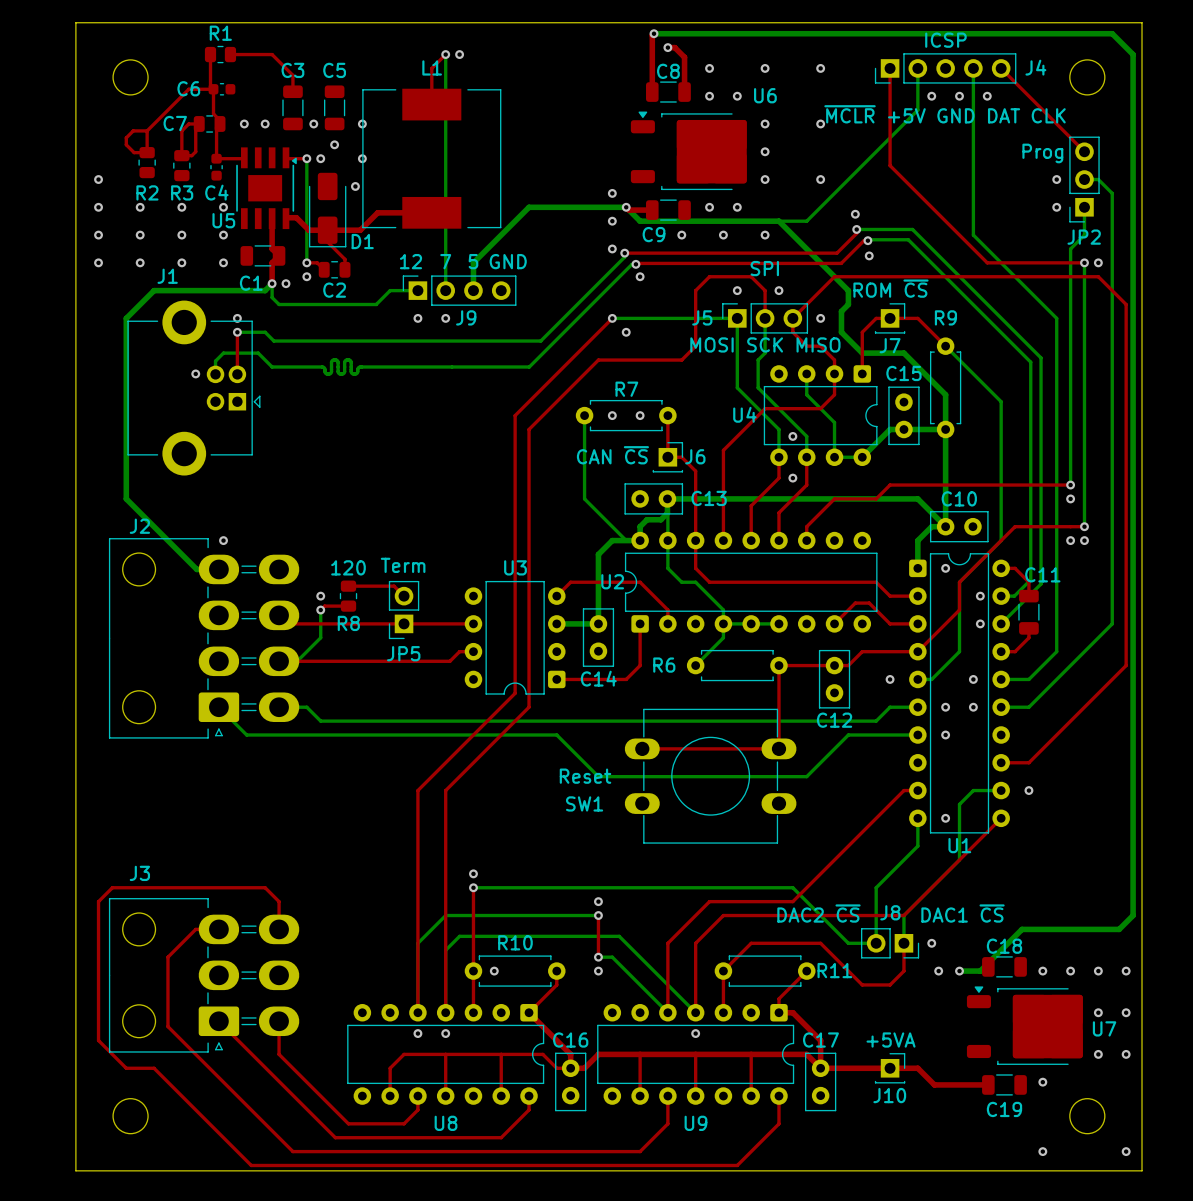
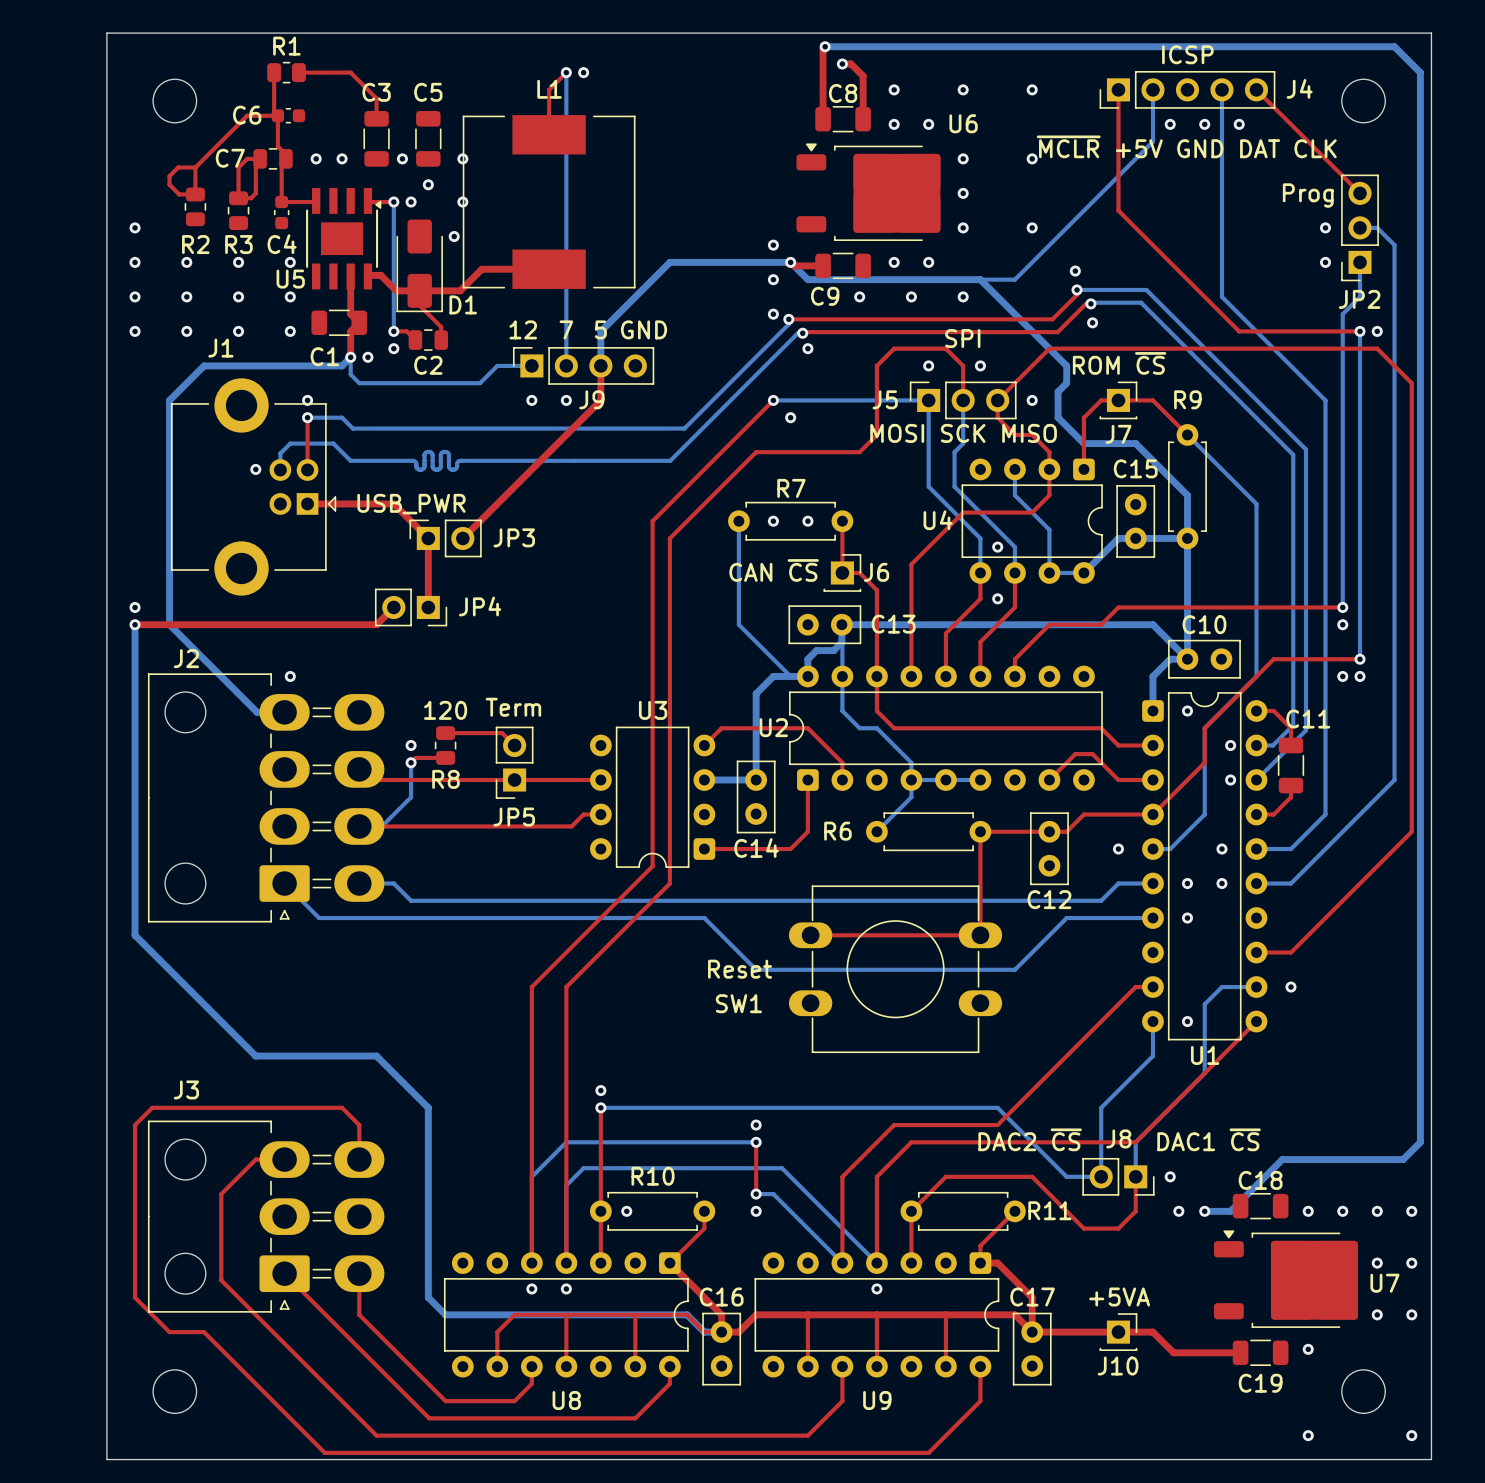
top track: none -> (600, 365) (600, 400) (462, 538)
top track: none -> (307, 503) (393, 503) (428, 538) (428, 607)
JP3: none -> USB_PWR (445, 538)
via: none -> (135, 607)
top track: none -> (393, 607) (376, 624) (135, 624)
JP4: none -> (411, 607)
bottom track: none -> (135, 624) (135, 935) (255, 1056) (376, 1056) (428, 1107) (428, 1297) (445, 1314) (687, 1314) (704, 1332) (721, 1332)
via: none -> (135, 624)

